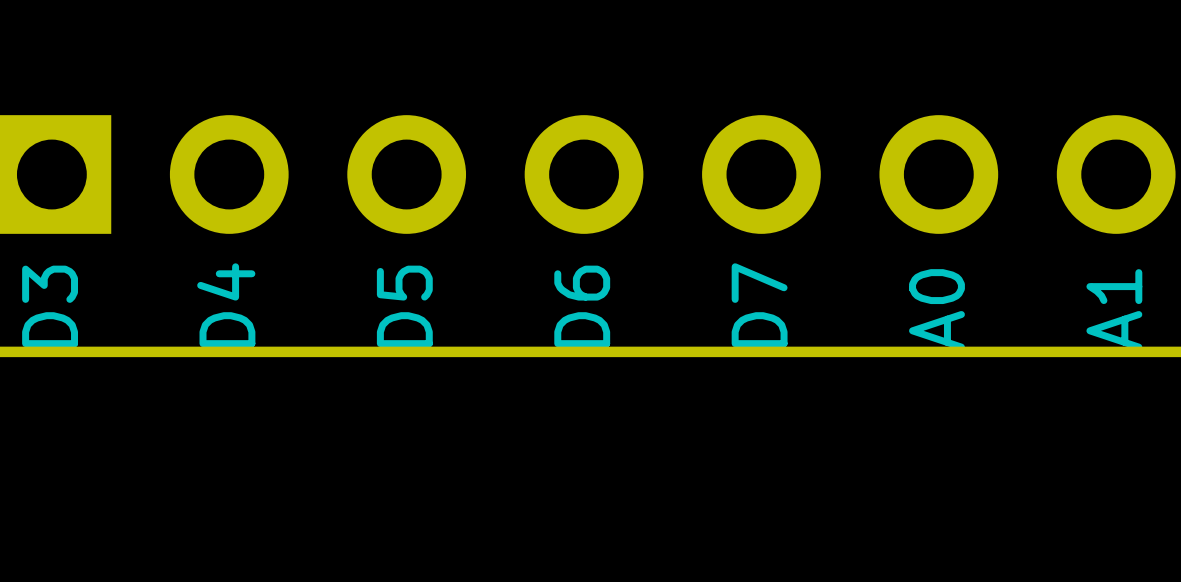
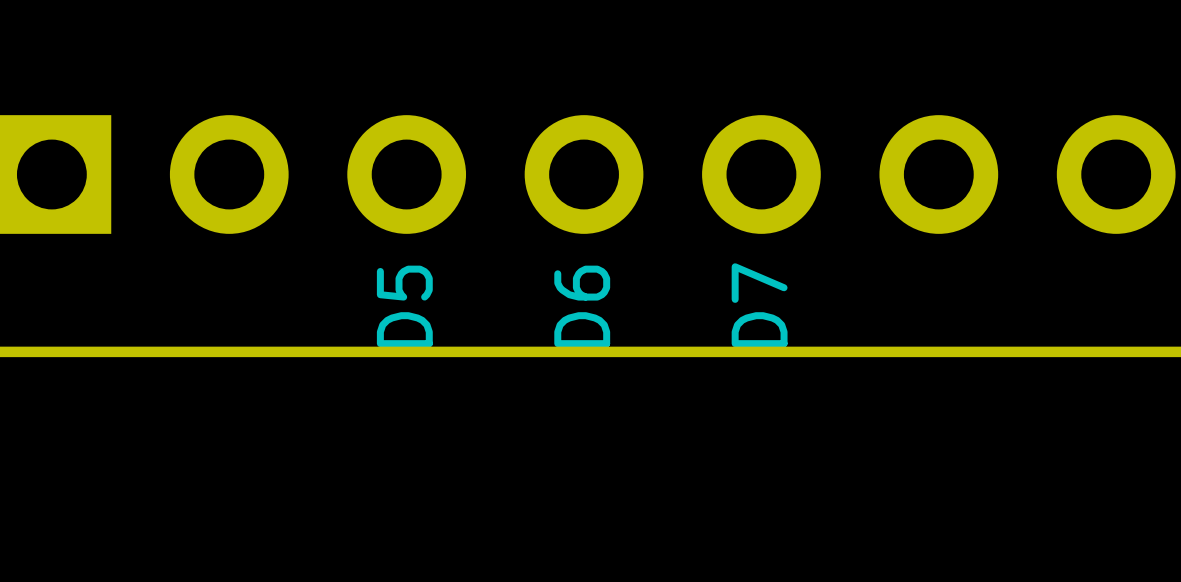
text: D4 (226, 305) -> none
text: D3 (50, 306) -> none
text: A0 (936, 309) -> none
text: A1 (1114, 309) -> none

